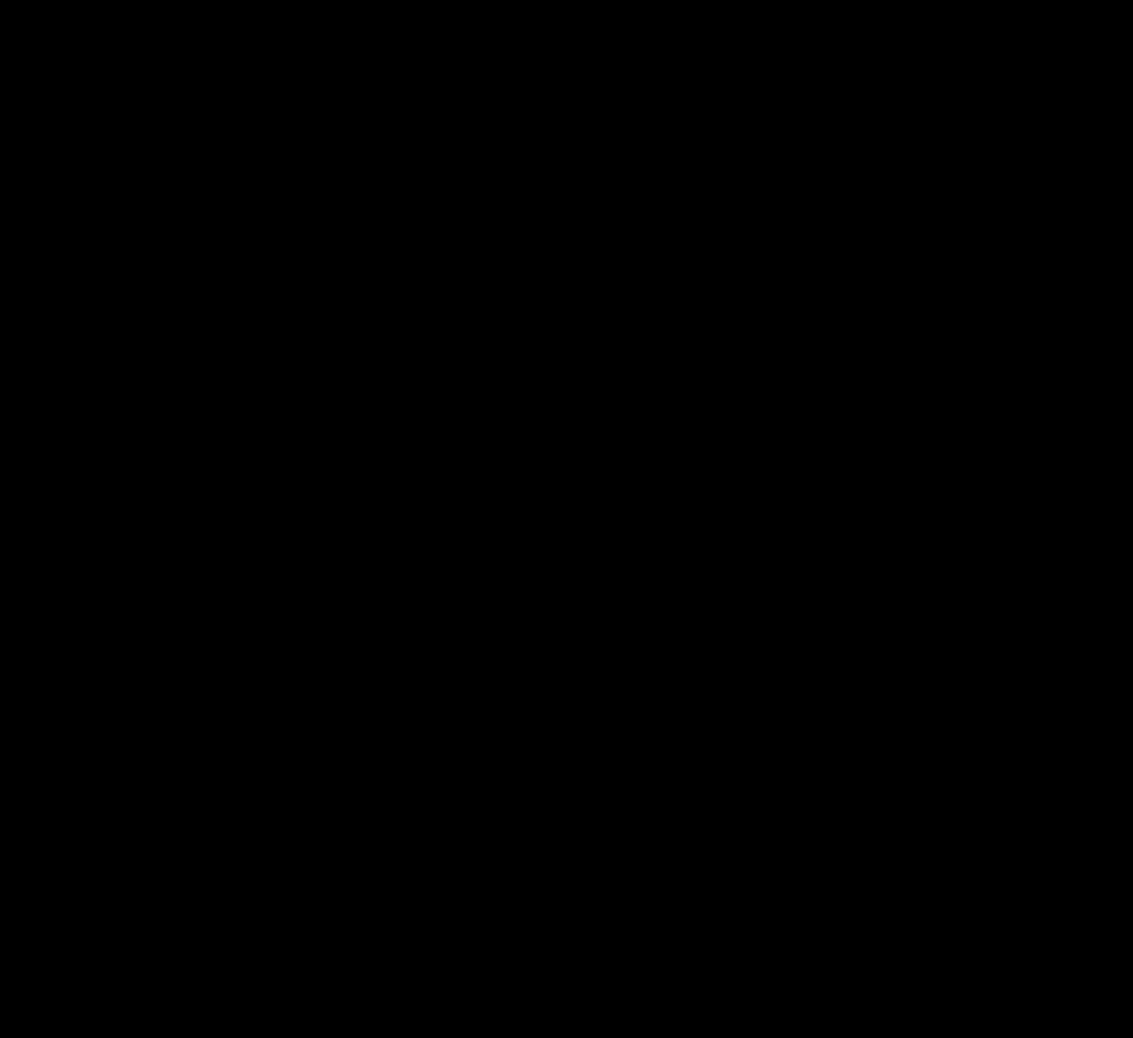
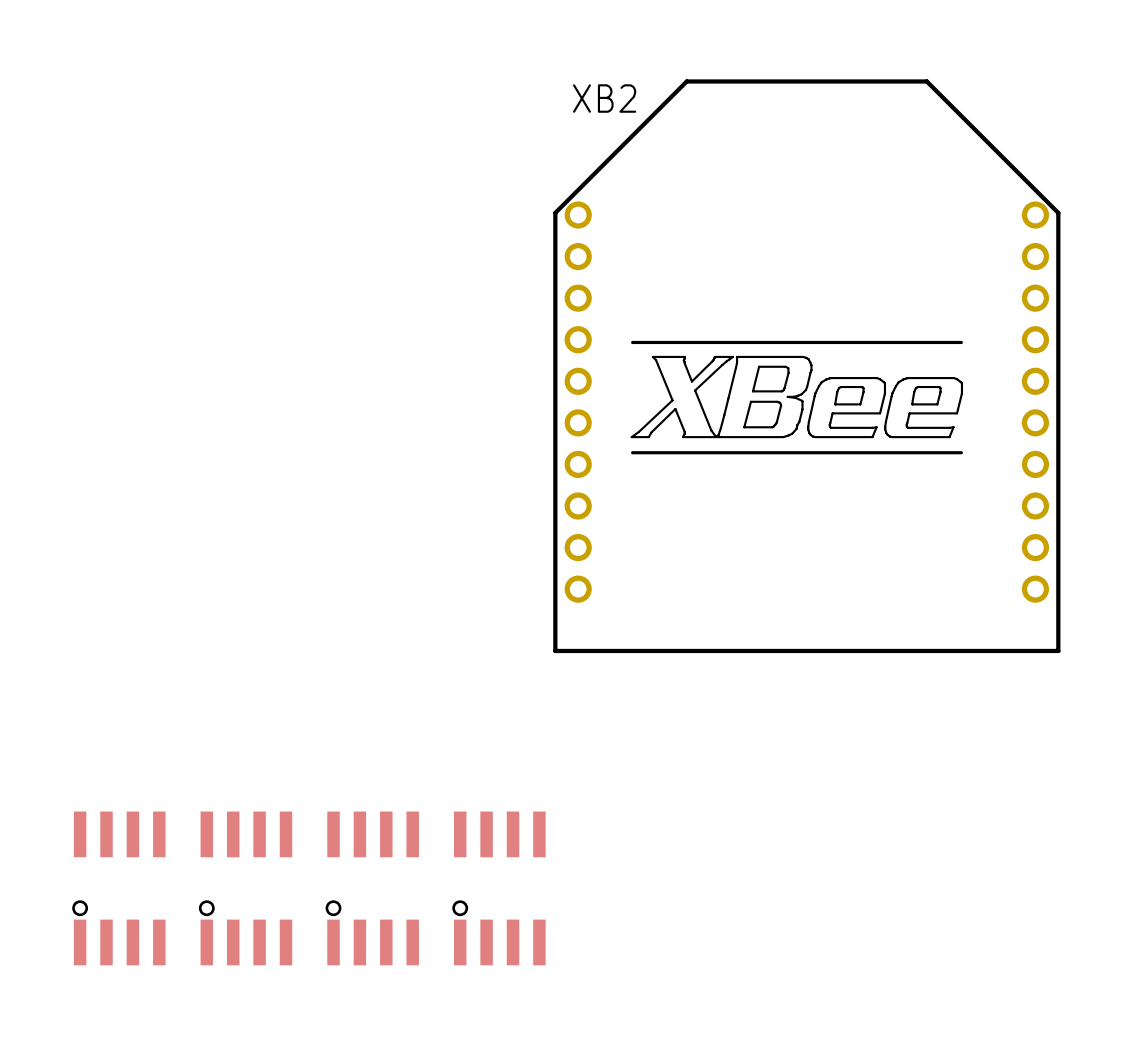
XB2: none -> (806, 366)
part: none -> (118, 888)
part: none -> (245, 888)
part: none -> (372, 888)
part: none -> (498, 888)

